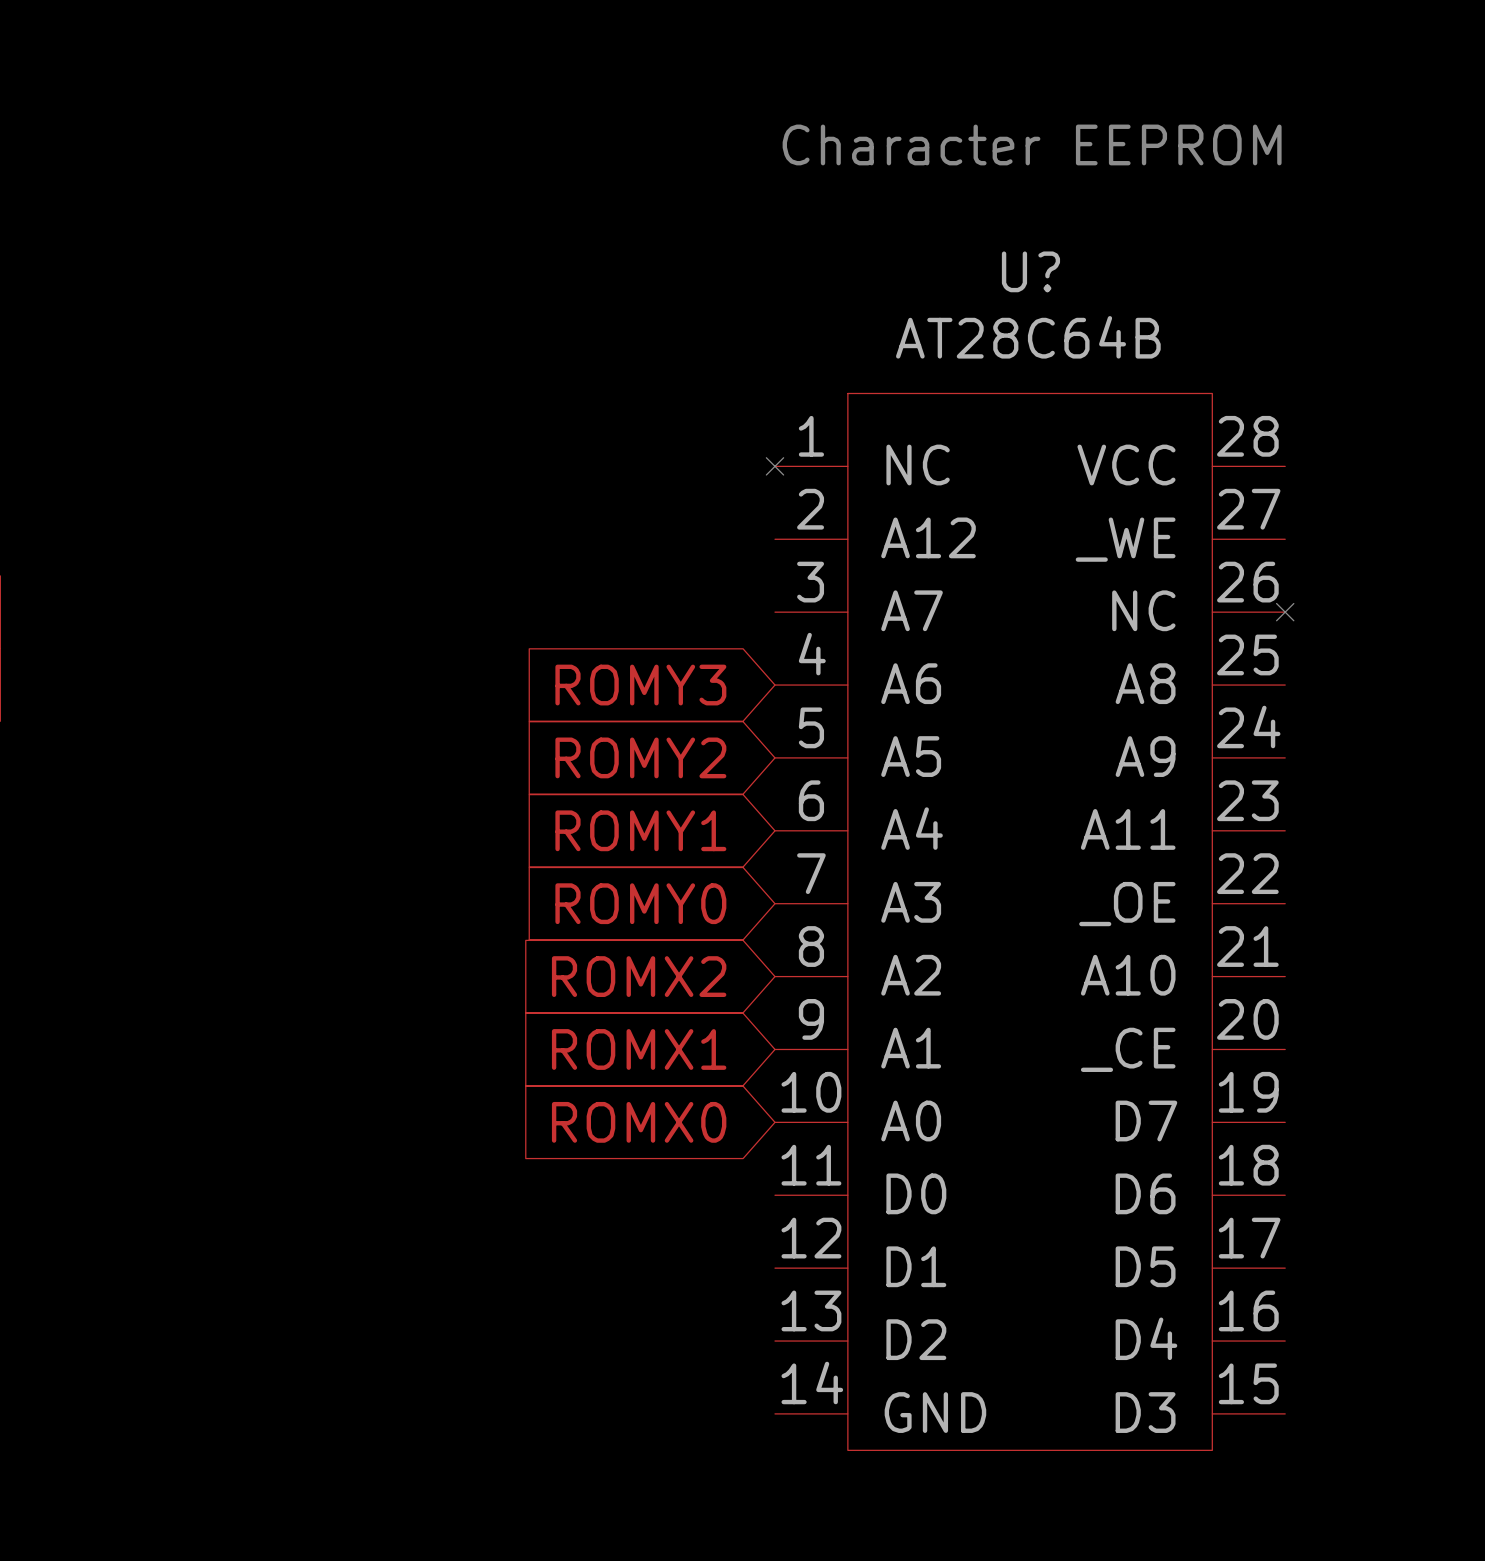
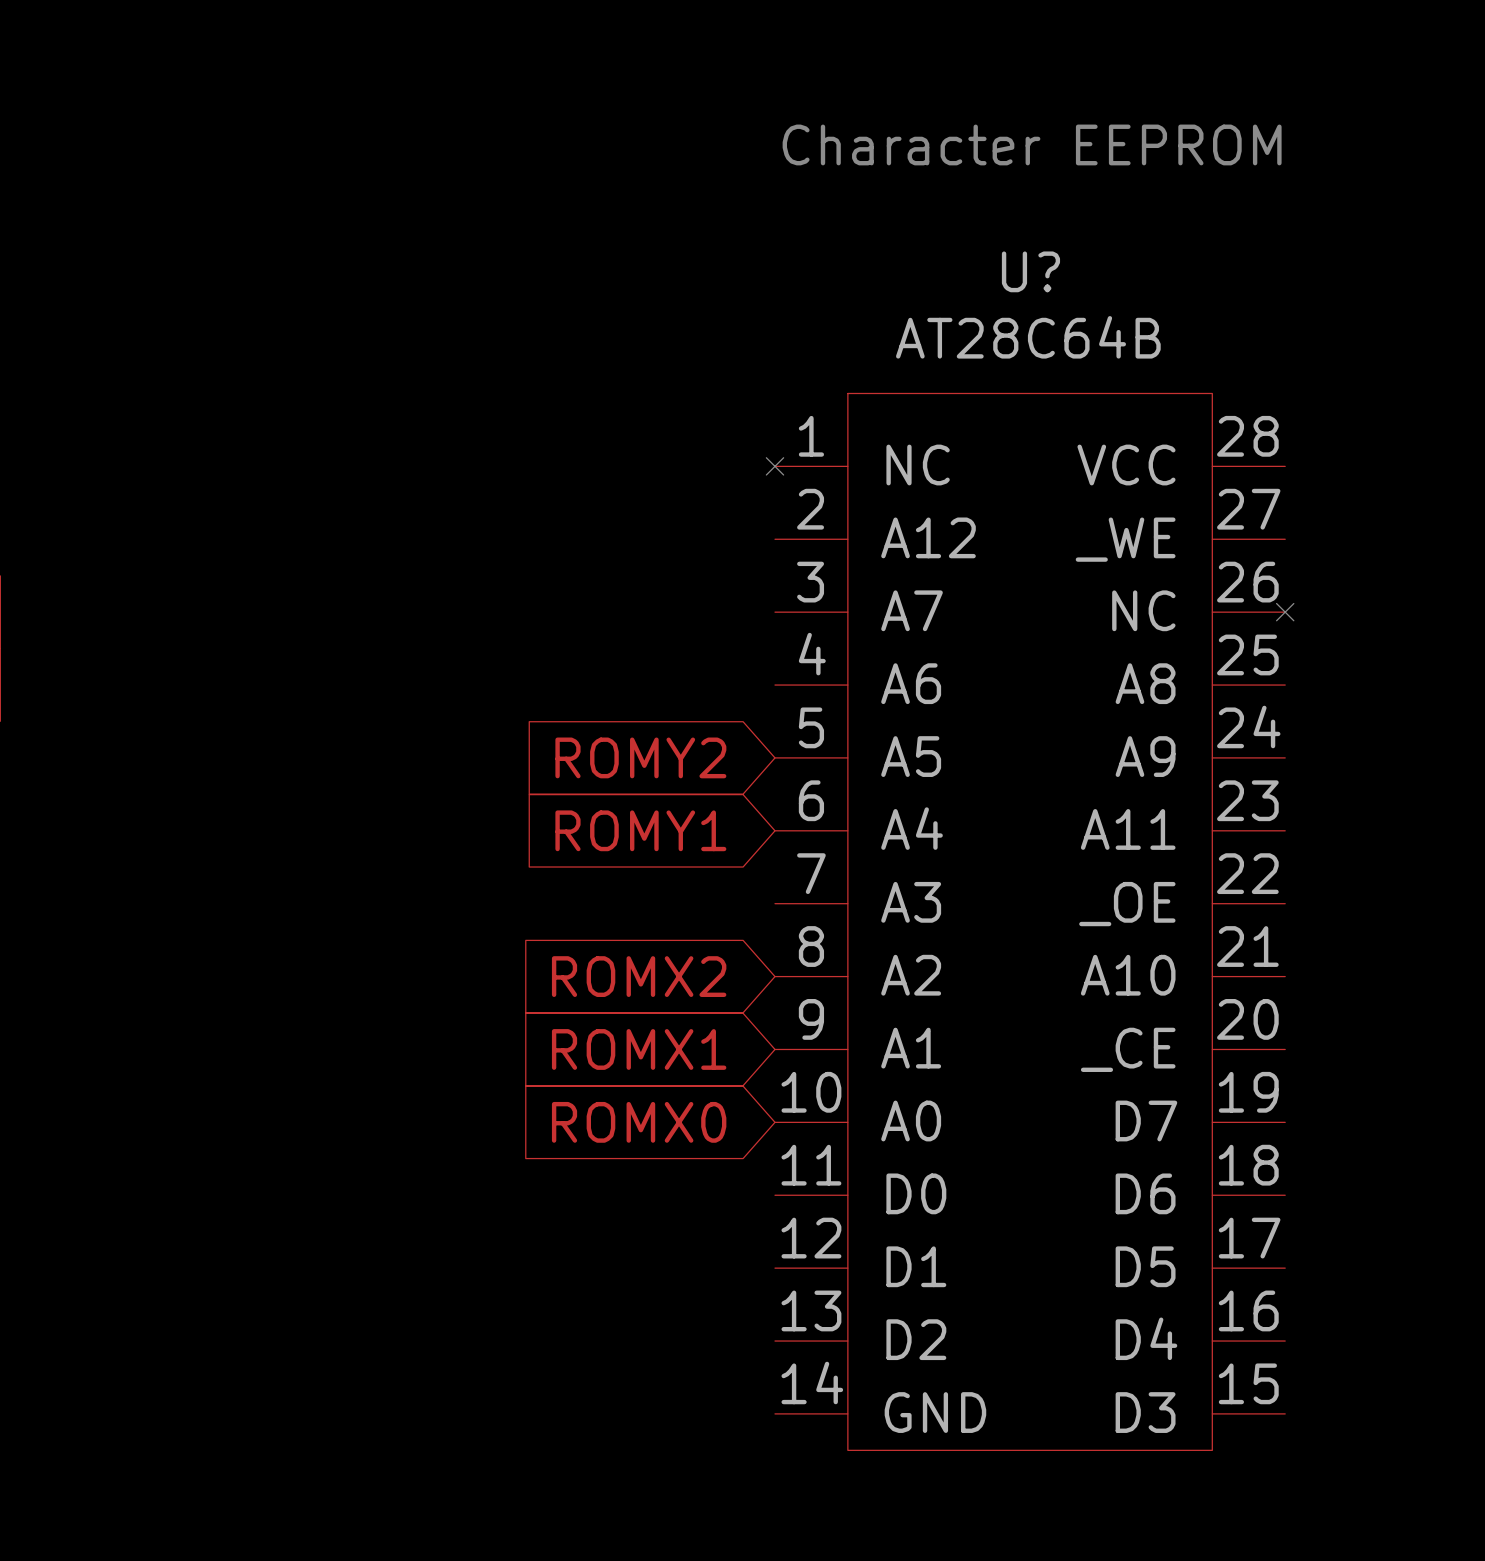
global label: ROMY3 (640, 685) -> none
global label: ROMY0 (640, 903) -> none

